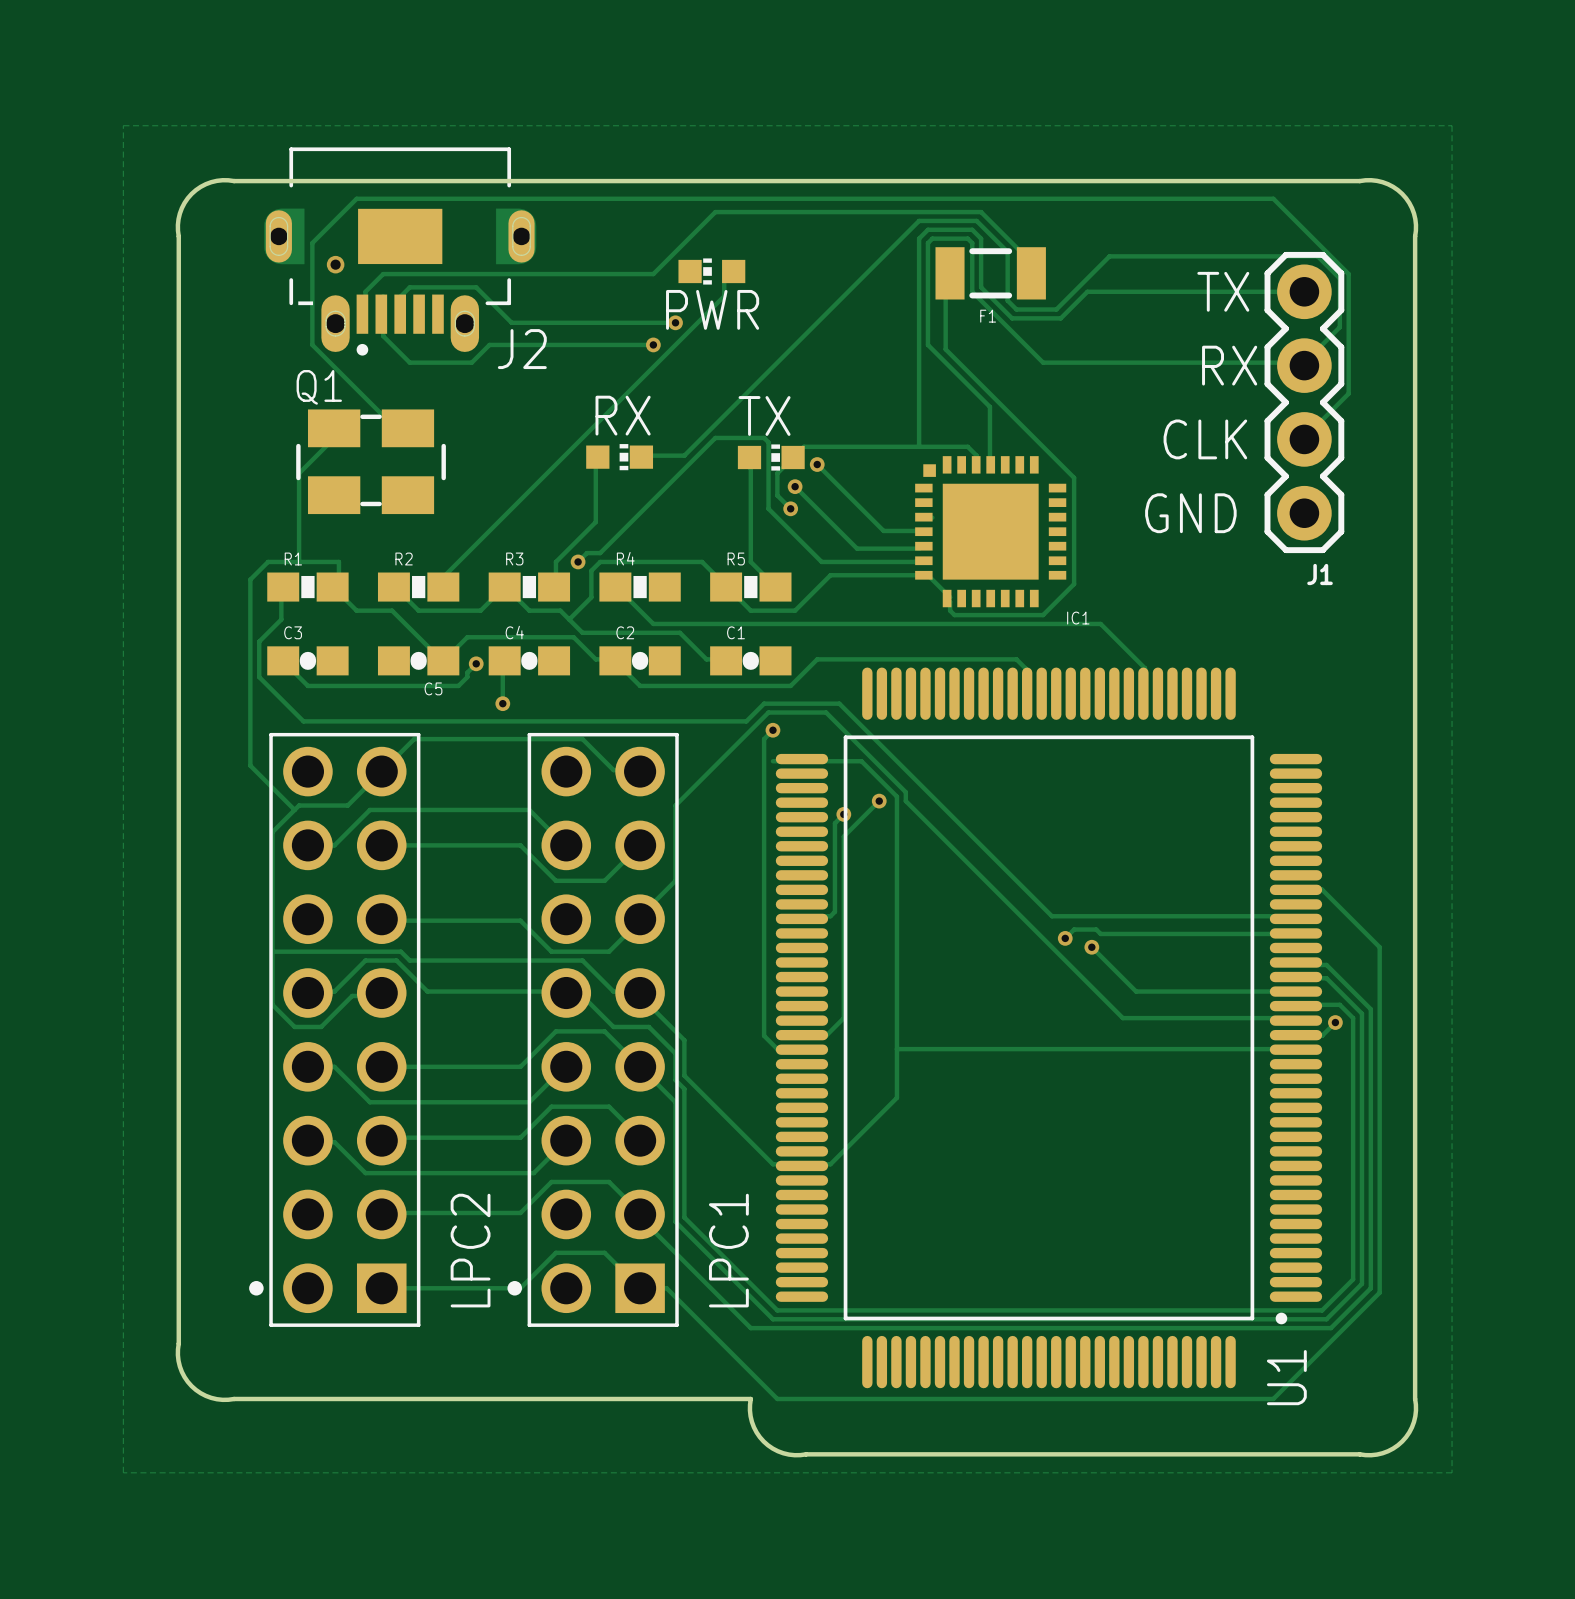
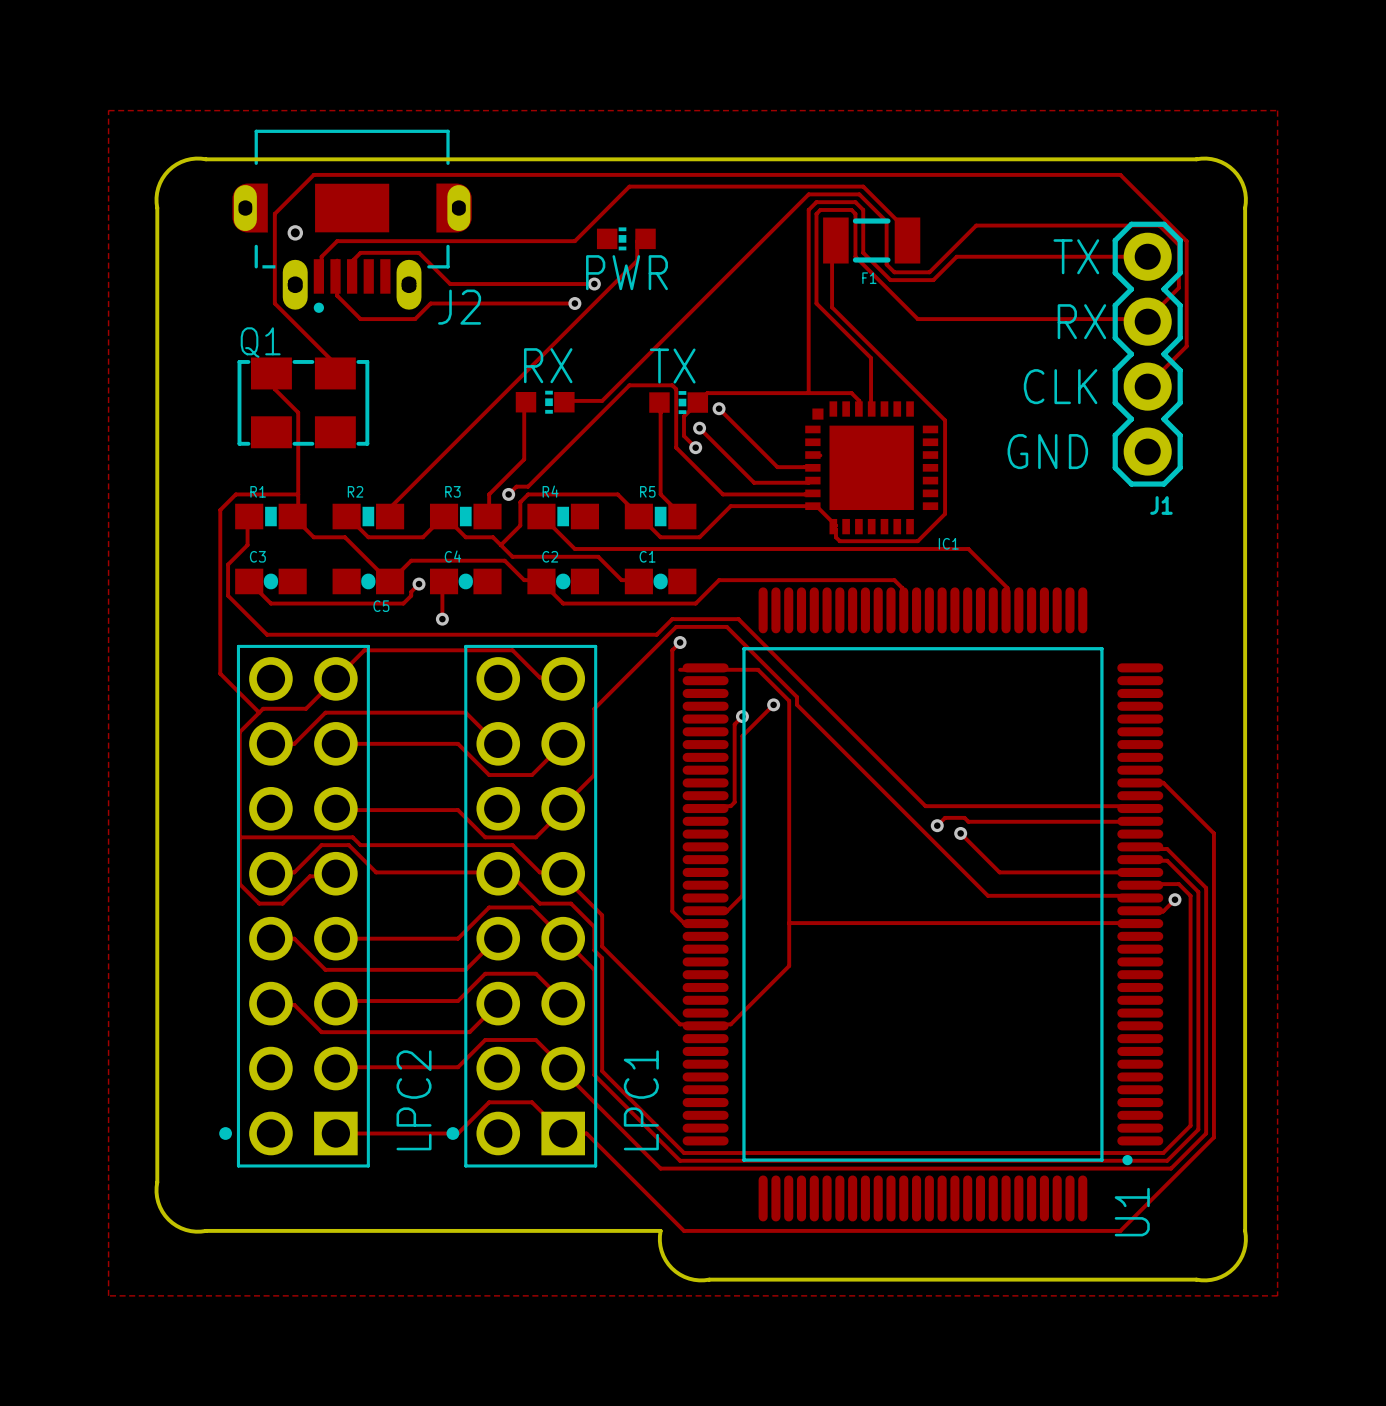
Q1 footprint: [296, 409, 446, 515] -> [237, 357, 370, 449]
track: none -> (270, 373) (274, 373) (274, 389) (298, 412) (298, 494)
track: (334, 428) (330, 429) (330, 442) (299, 473) (299, 561) -> none

